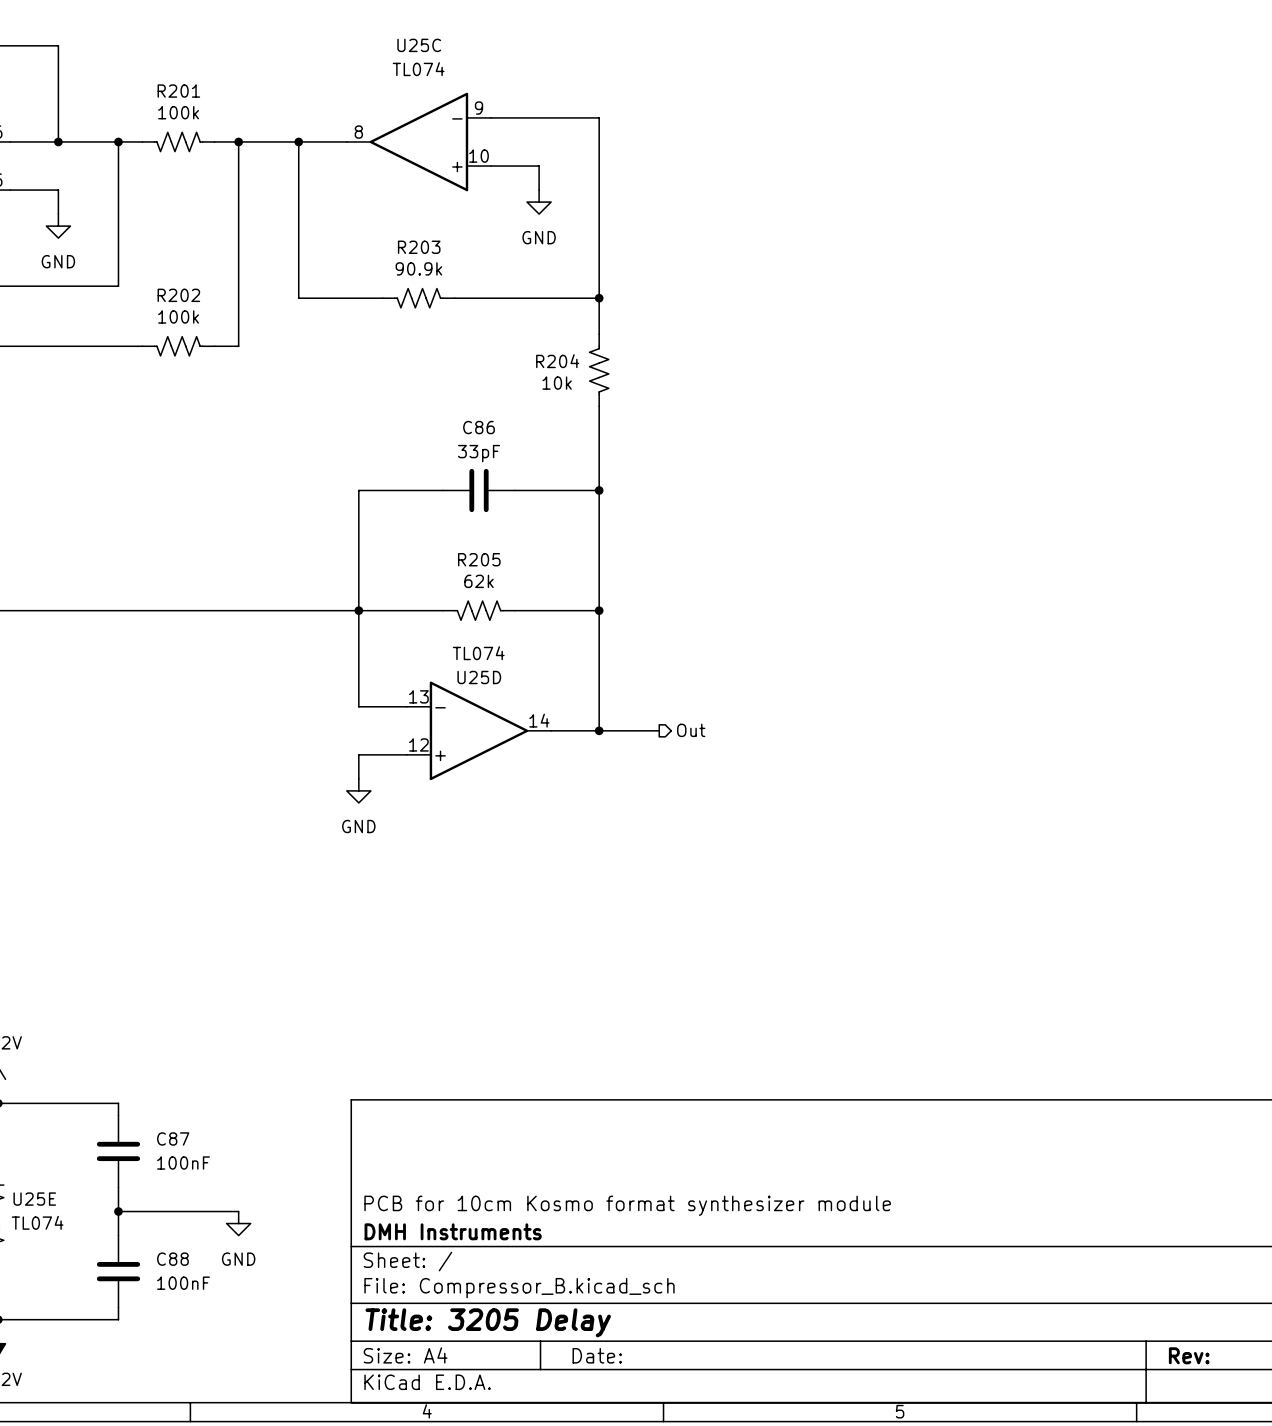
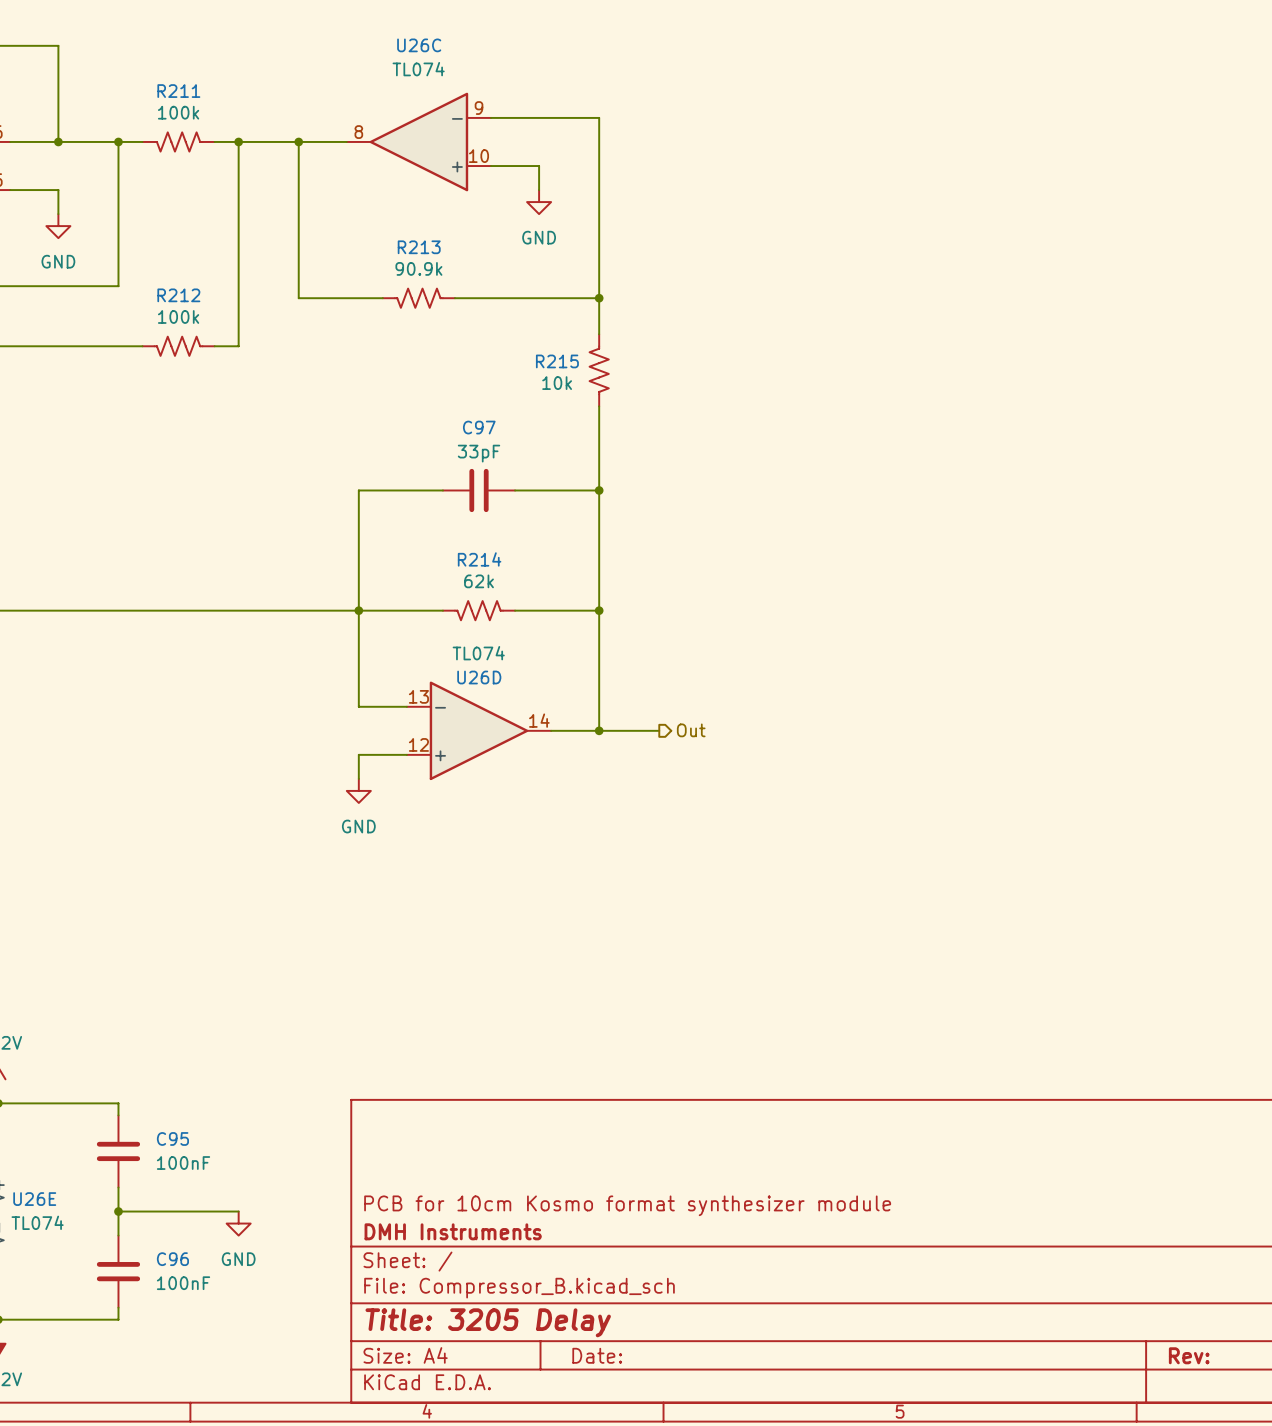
U25C name: U25C (419, 45) -> U26C (419, 45)
R201 name: R201 (178, 91) -> R211 (178, 91)
R203 name: R203 (419, 247) -> R213 (419, 247)
R202 name: R202 (178, 295) -> R212 (178, 295)
R204 name: R204 (557, 361) -> R215 (557, 361)
C86 name: C86 (479, 427) -> C97 (479, 427)
R205 name: R205 (479, 559) -> R214 (479, 559)
U25D name: U25D (479, 677) -> U26D (479, 677)
C87 name: C87 (173, 1138) -> C95 (172, 1138)
U25E name: U25E (34, 1199) -> U26E (34, 1199)
C88 name: C88 (172, 1259) -> C96 (172, 1259)

